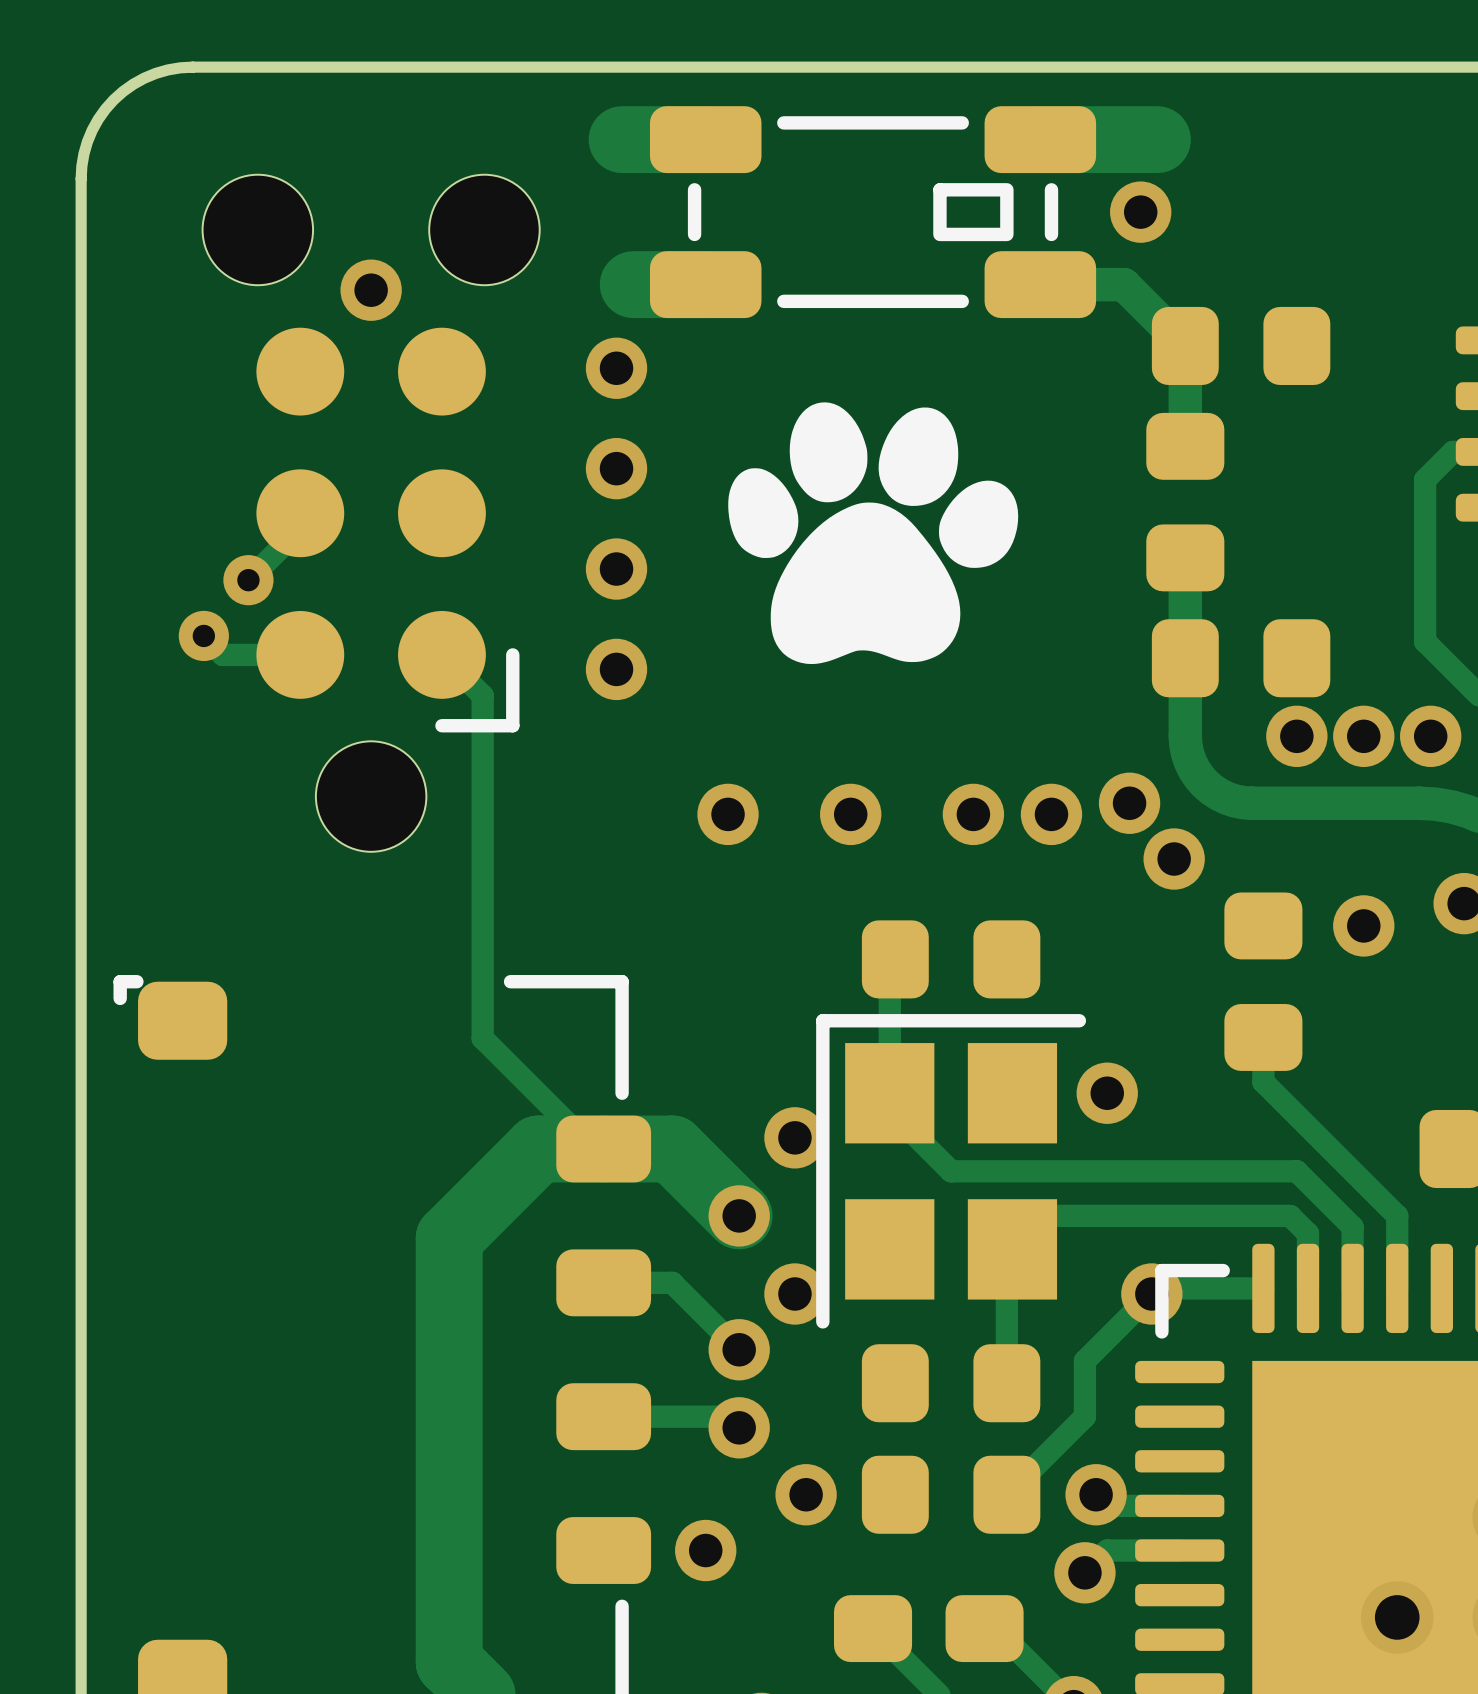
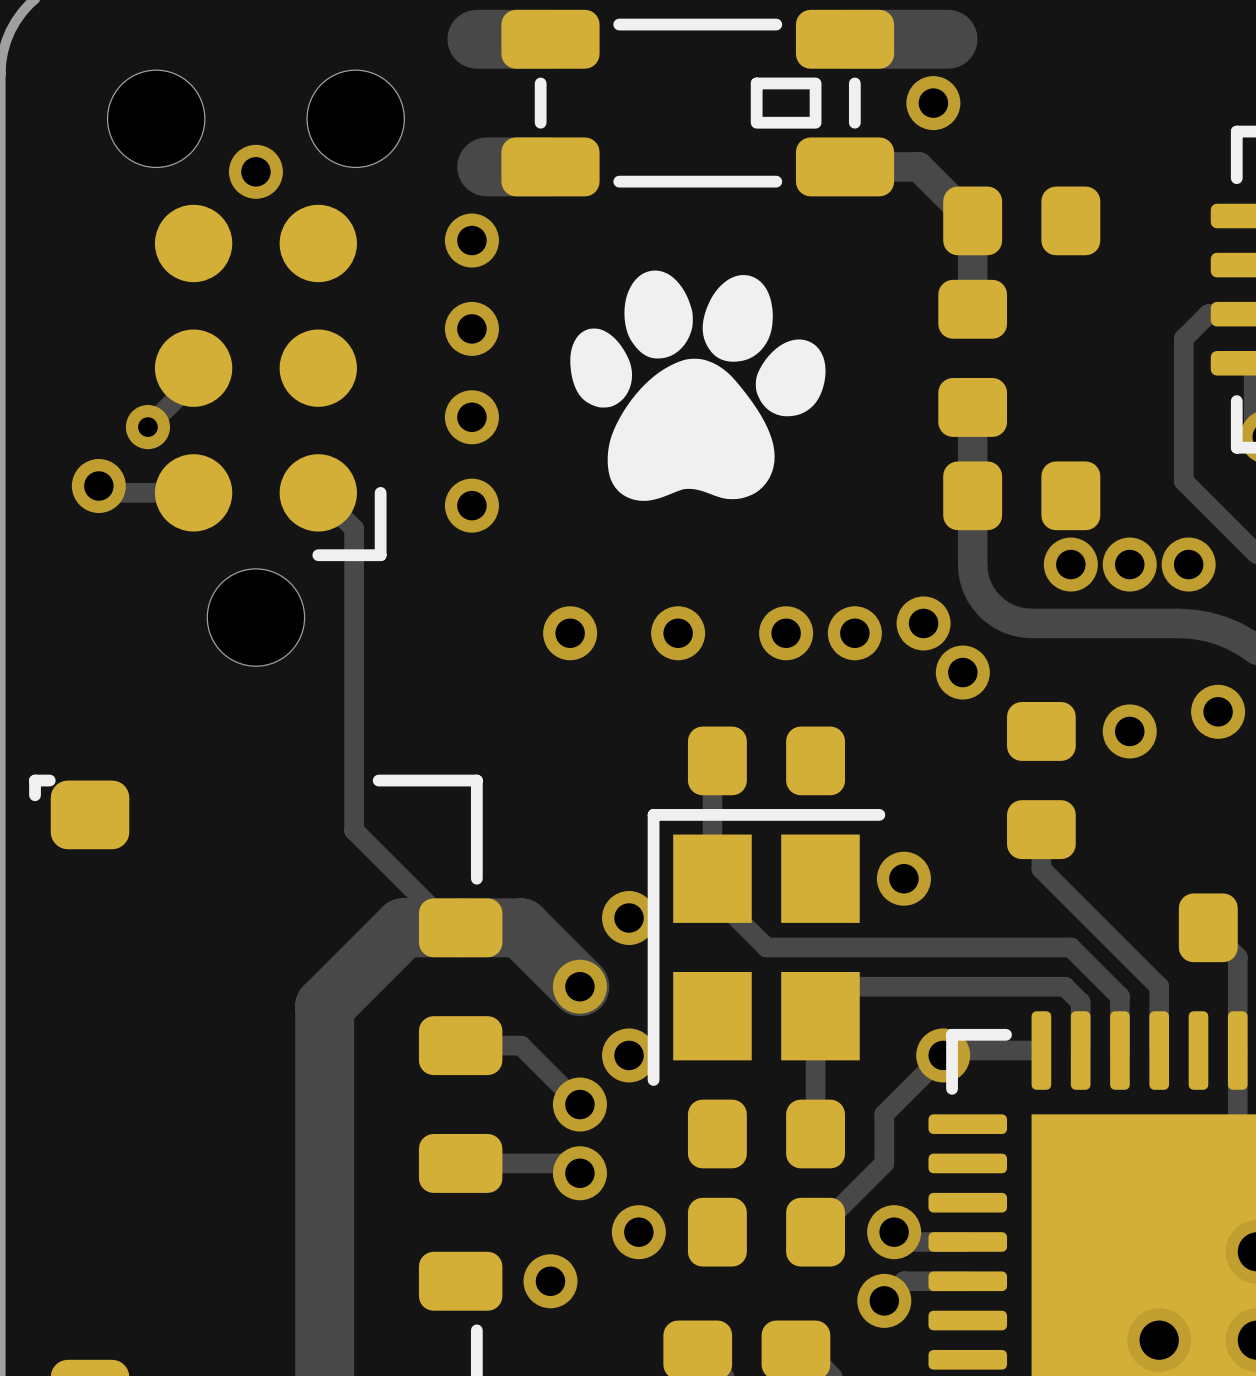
via size: [178, 610, 229, 662] -> [71, 459, 126, 513]

